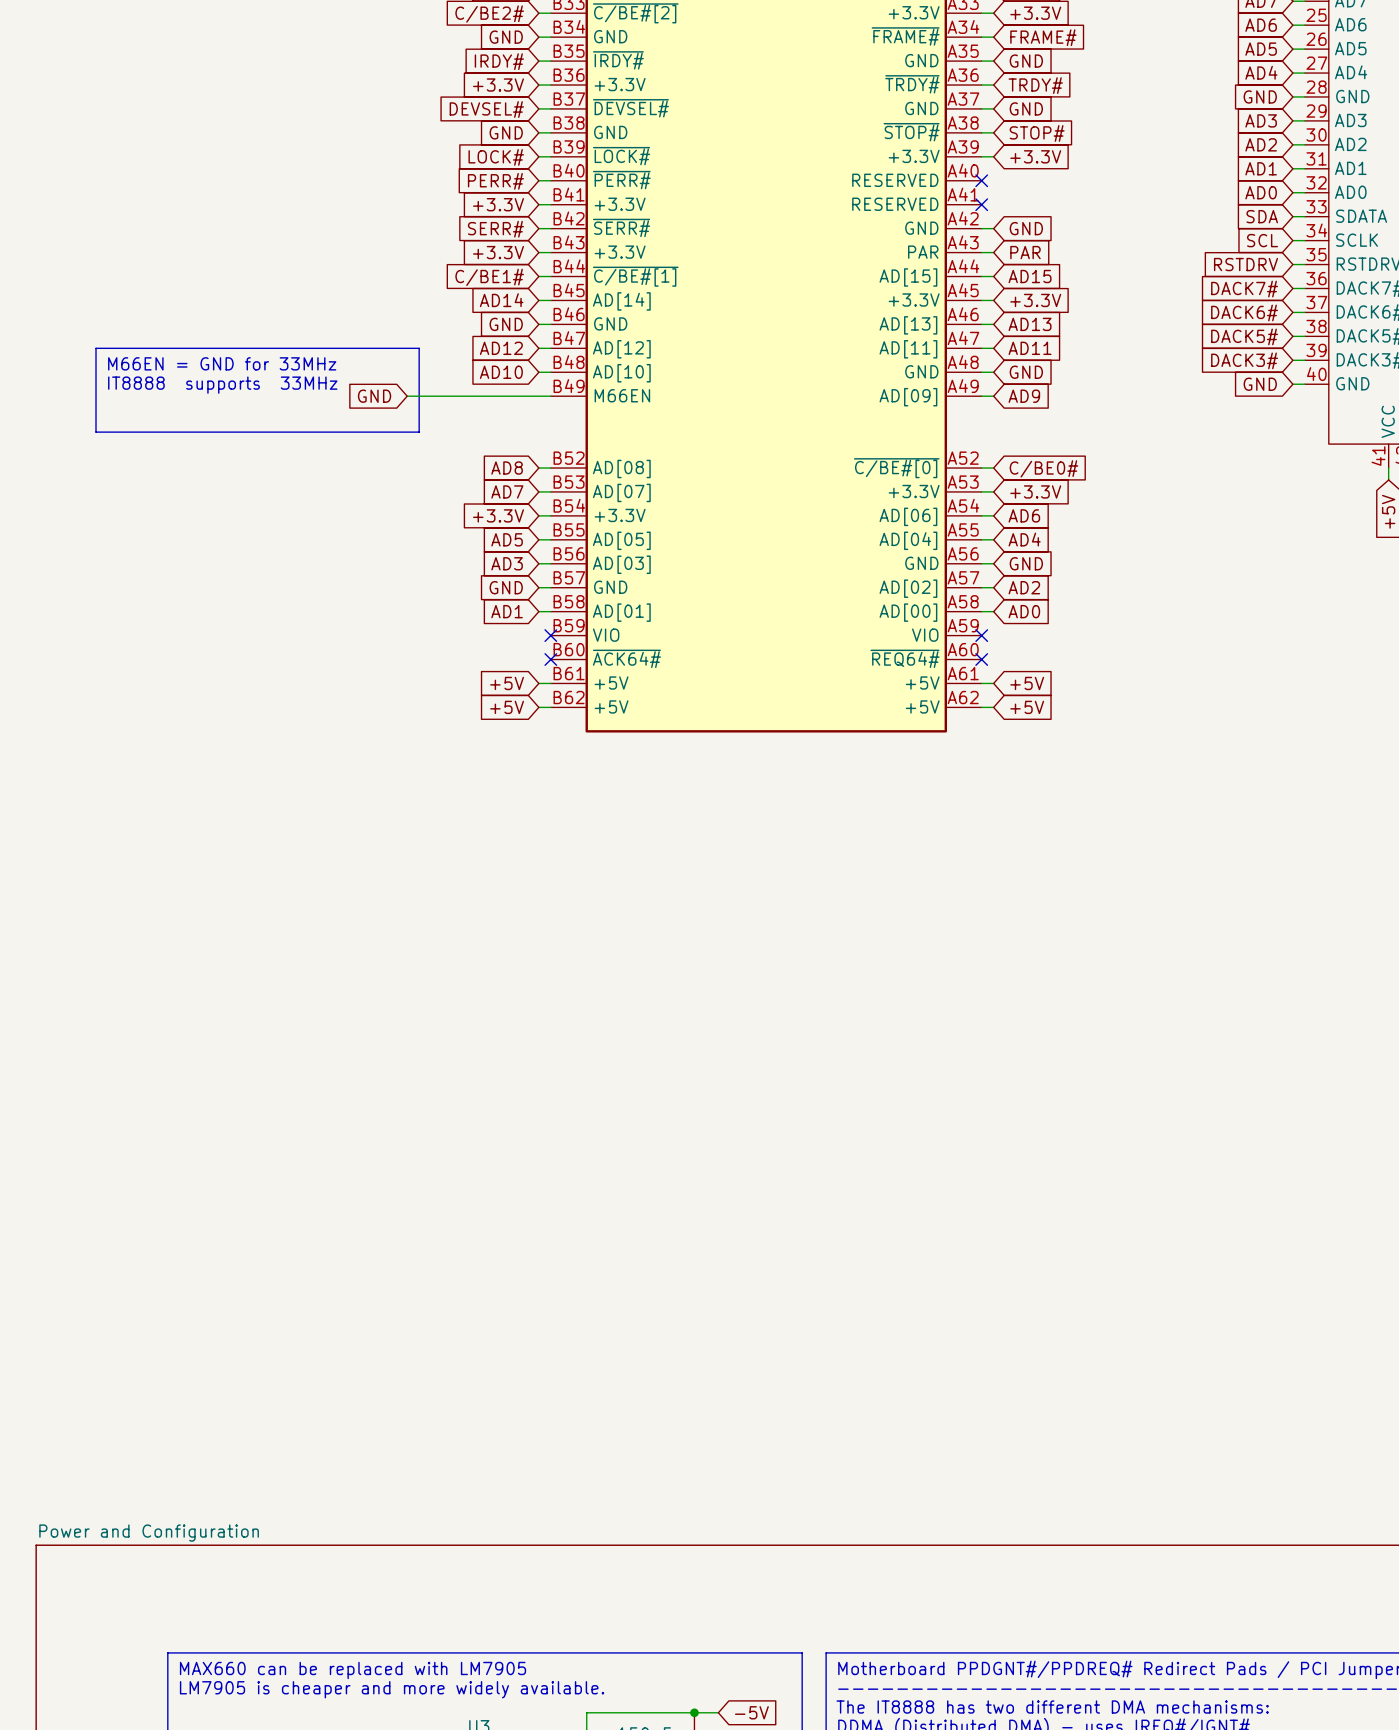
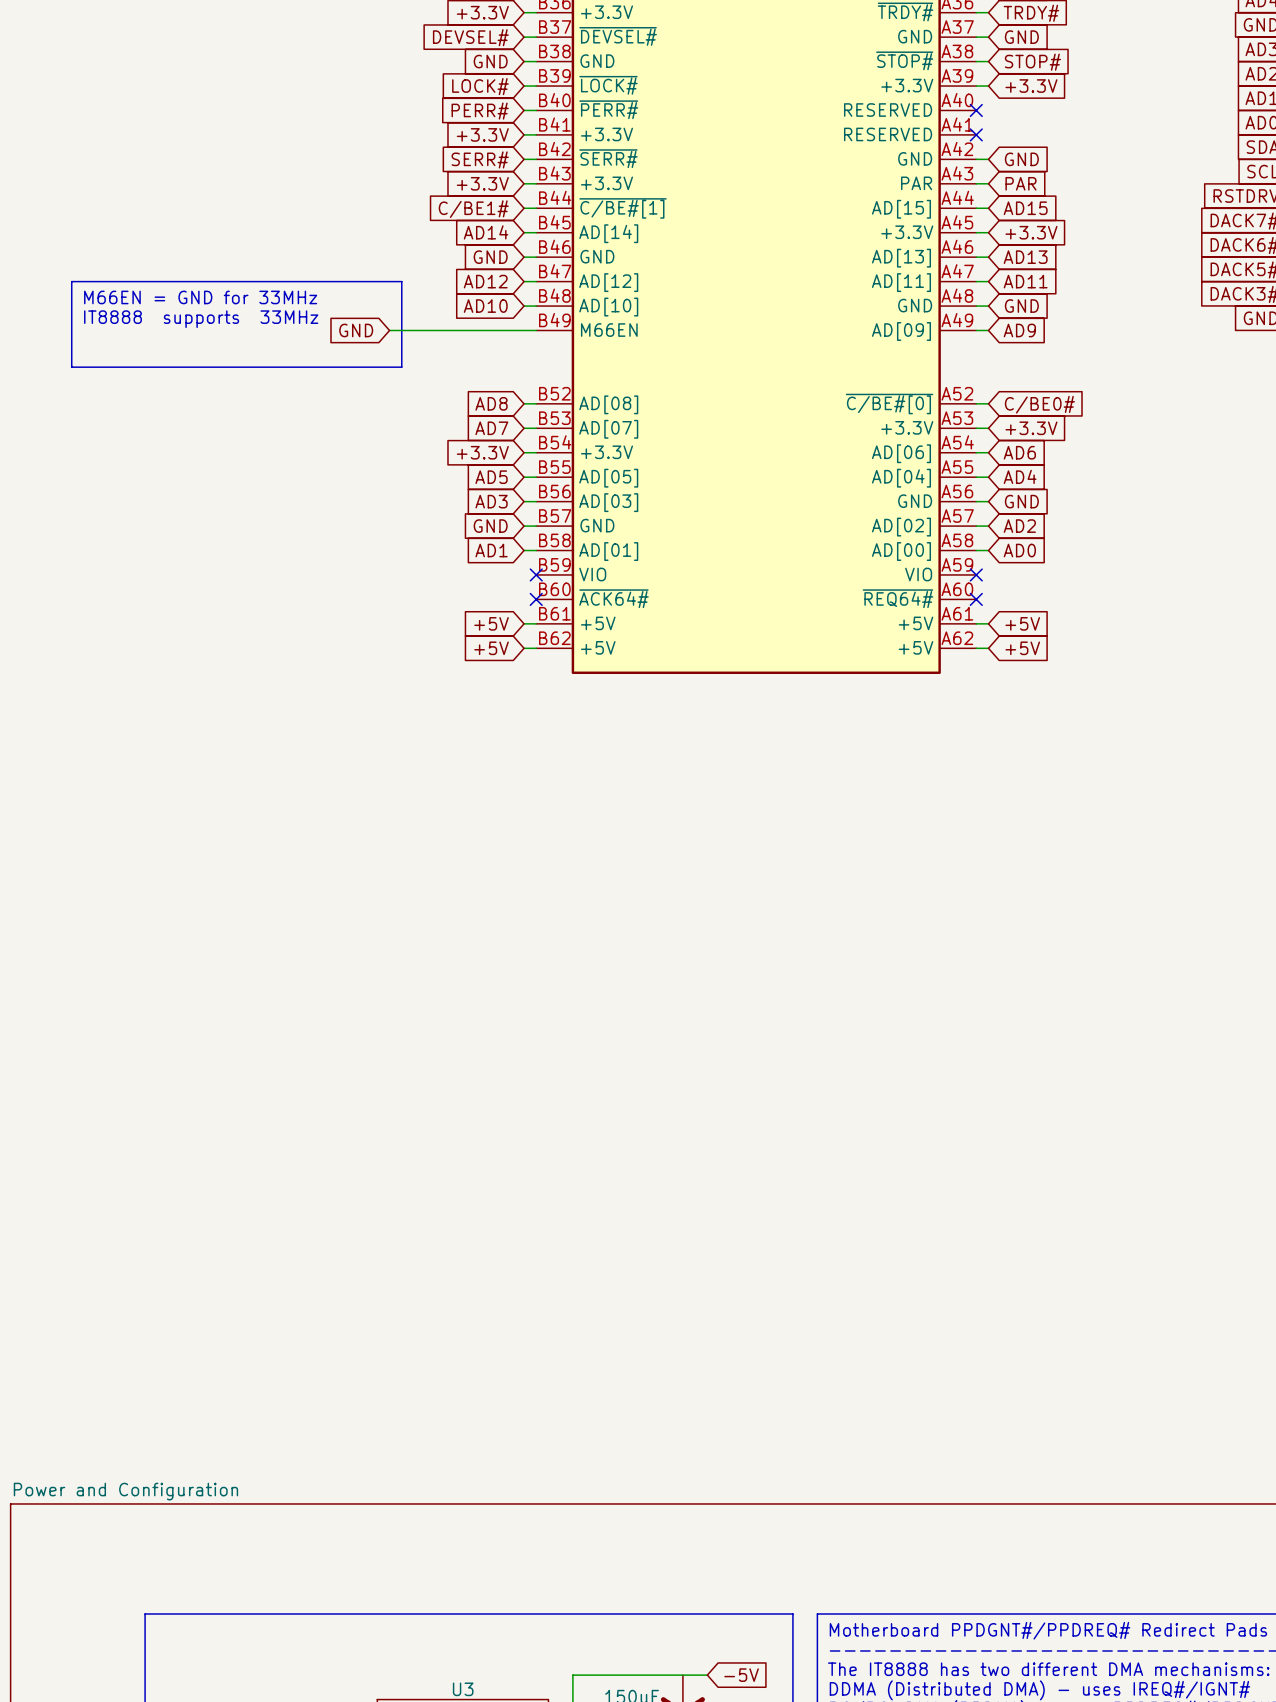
text: MAX660 can be replaced with LM7905 (353, 1670) -> none
text: LM7905 is cheaper and more widely available. (392, 1689) -> none
junction: (694, 1712) -> none

